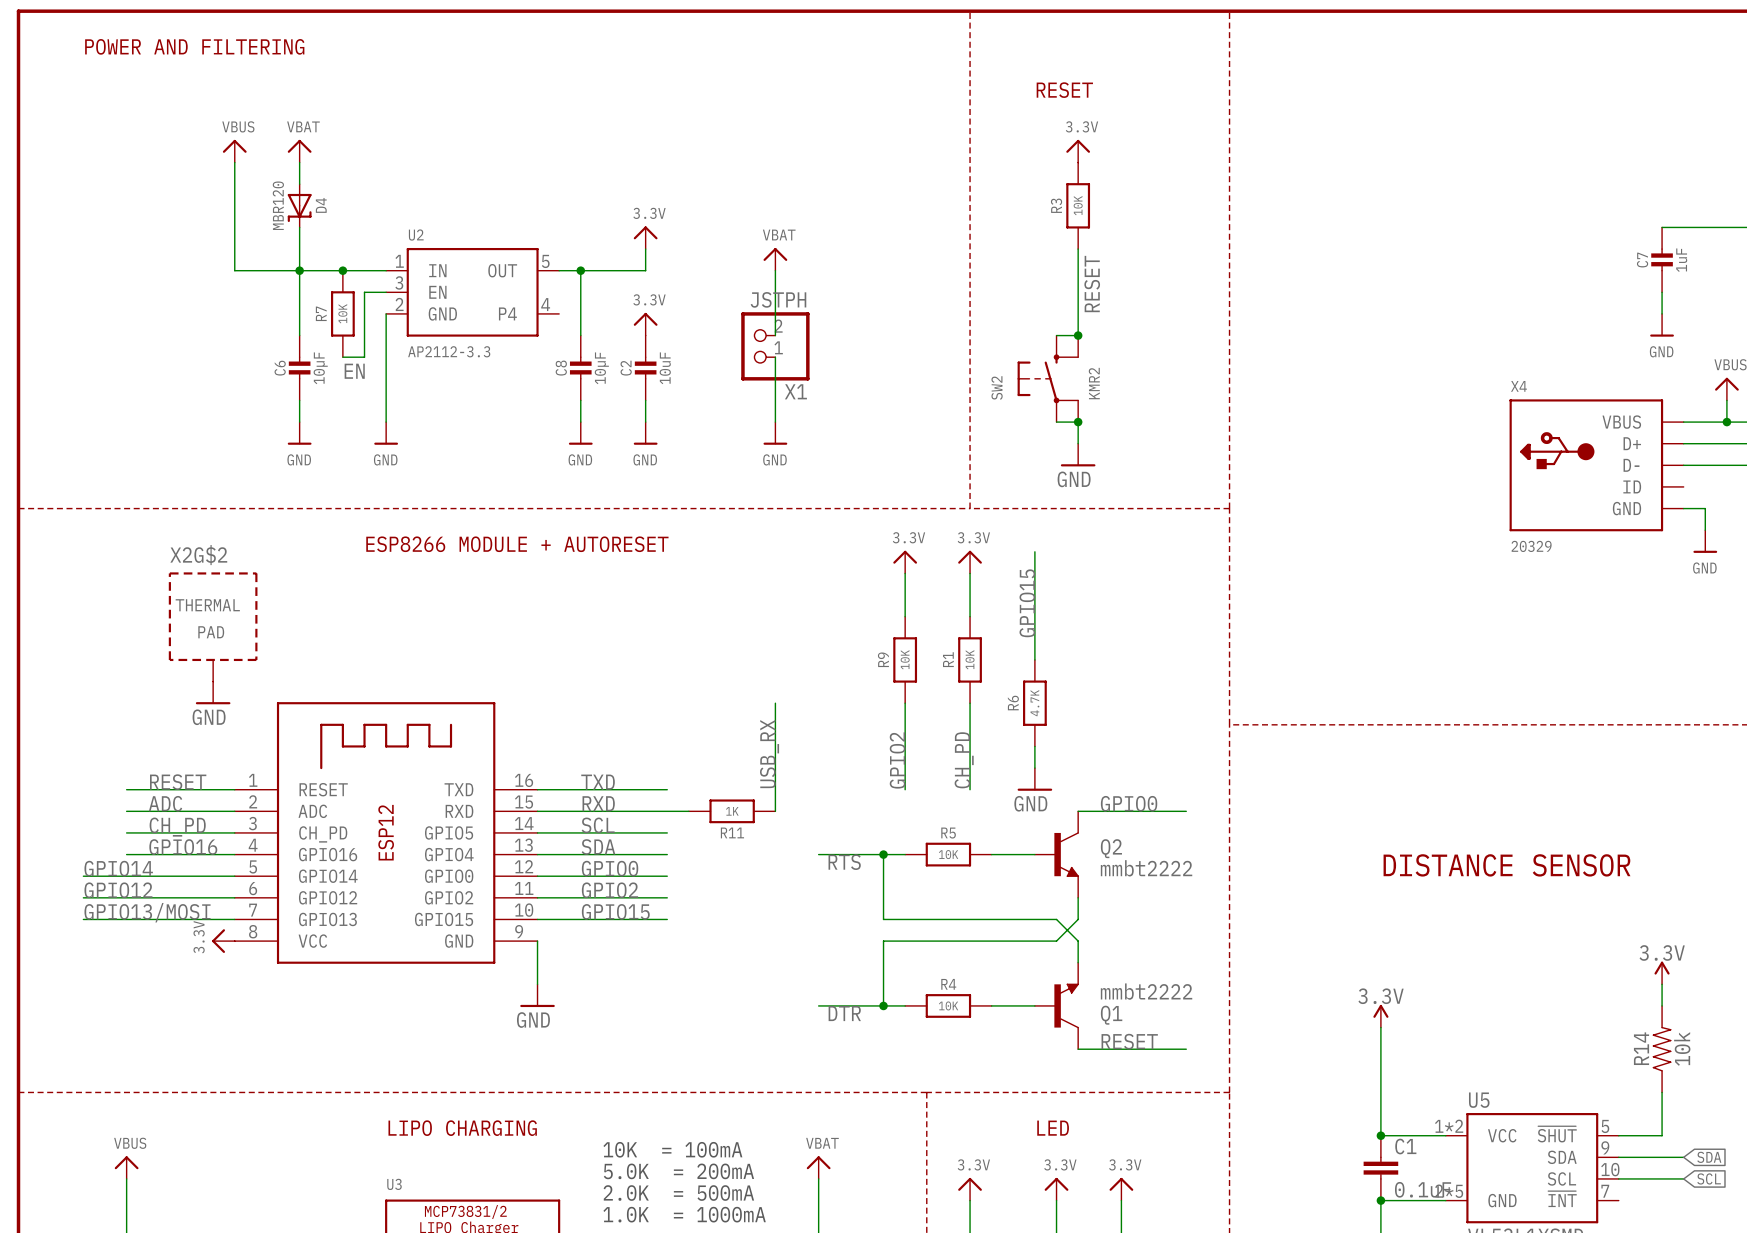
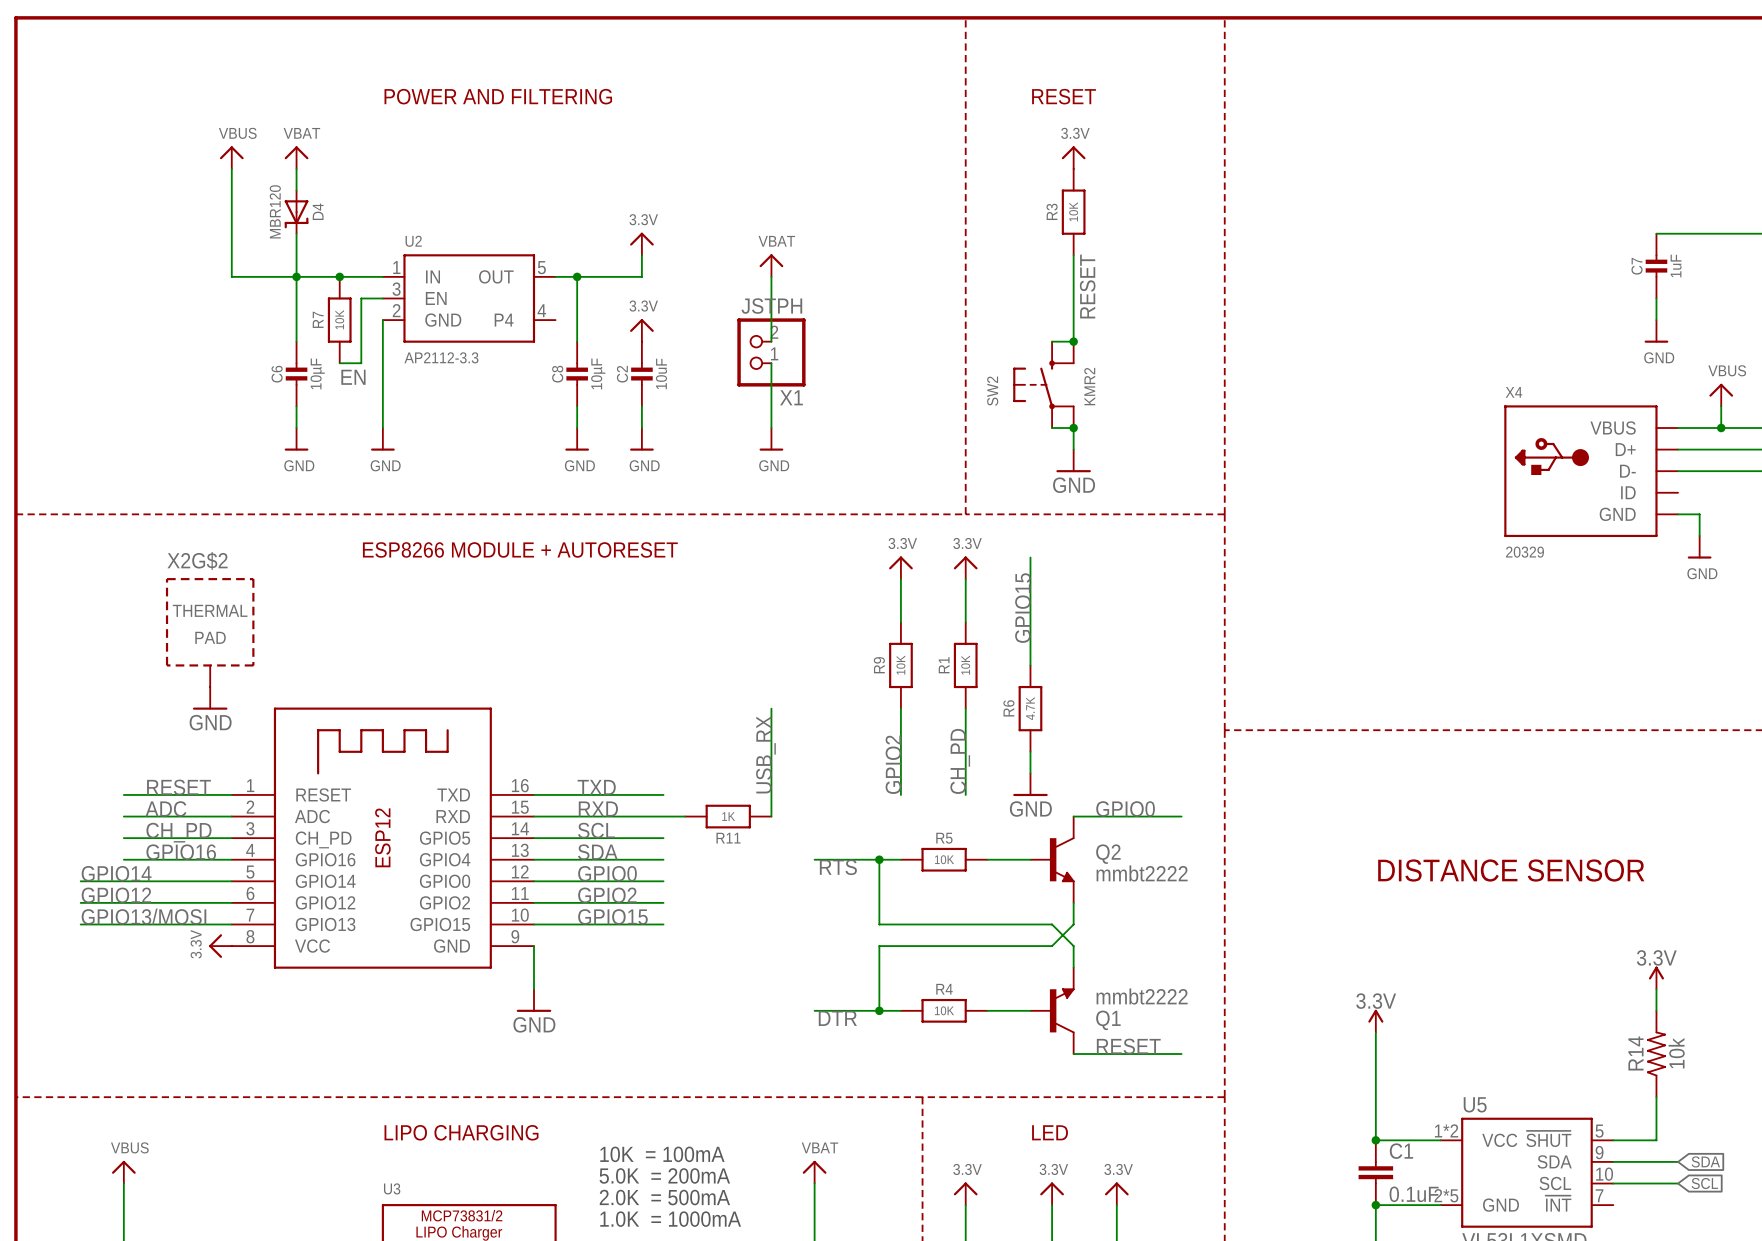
text: POWER AND FILTERING (194, 46) -> none
text: none -> POWER AND FILTERING (498, 96)

